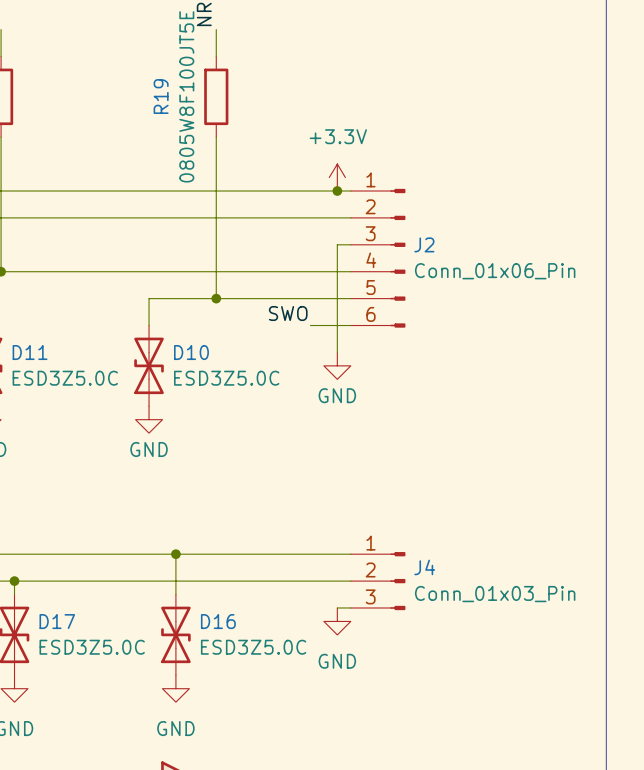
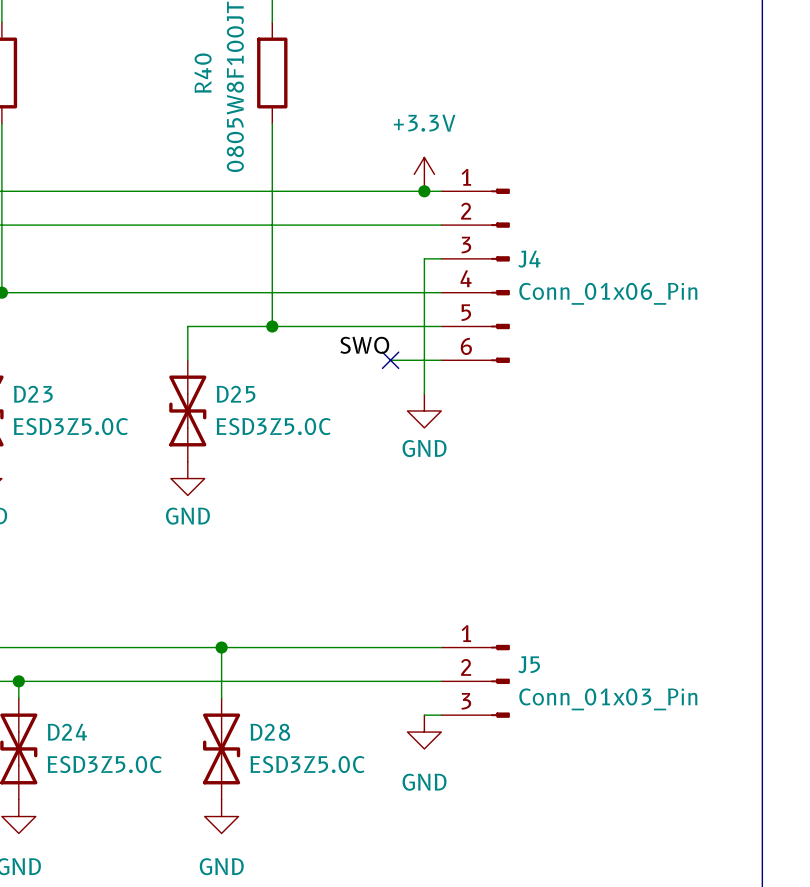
R19 name: R19 (161, 96) -> R40 (203, 73)
J2 name: J2 (424, 244) -> J4 (529, 259)
no-connect mark: none -> (390, 360)
D11 name: D11 (30, 352) -> D23 (33, 394)
D10 name: D10 (191, 352) -> D25 (236, 394)
J4 name: J4 (424, 567) -> J5 (529, 664)
D17 name: D17 (57, 621) -> D24 (67, 732)
D16 name: D16 (218, 621) -> D28 (270, 732)

